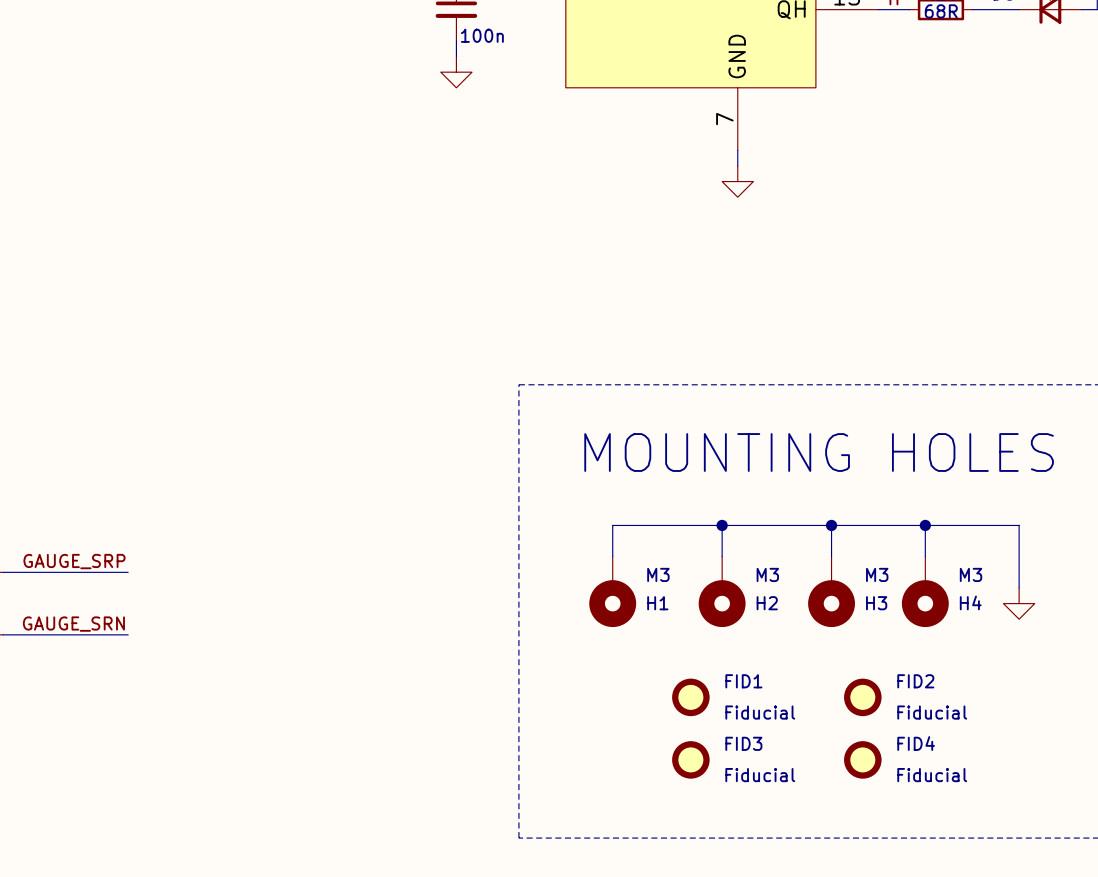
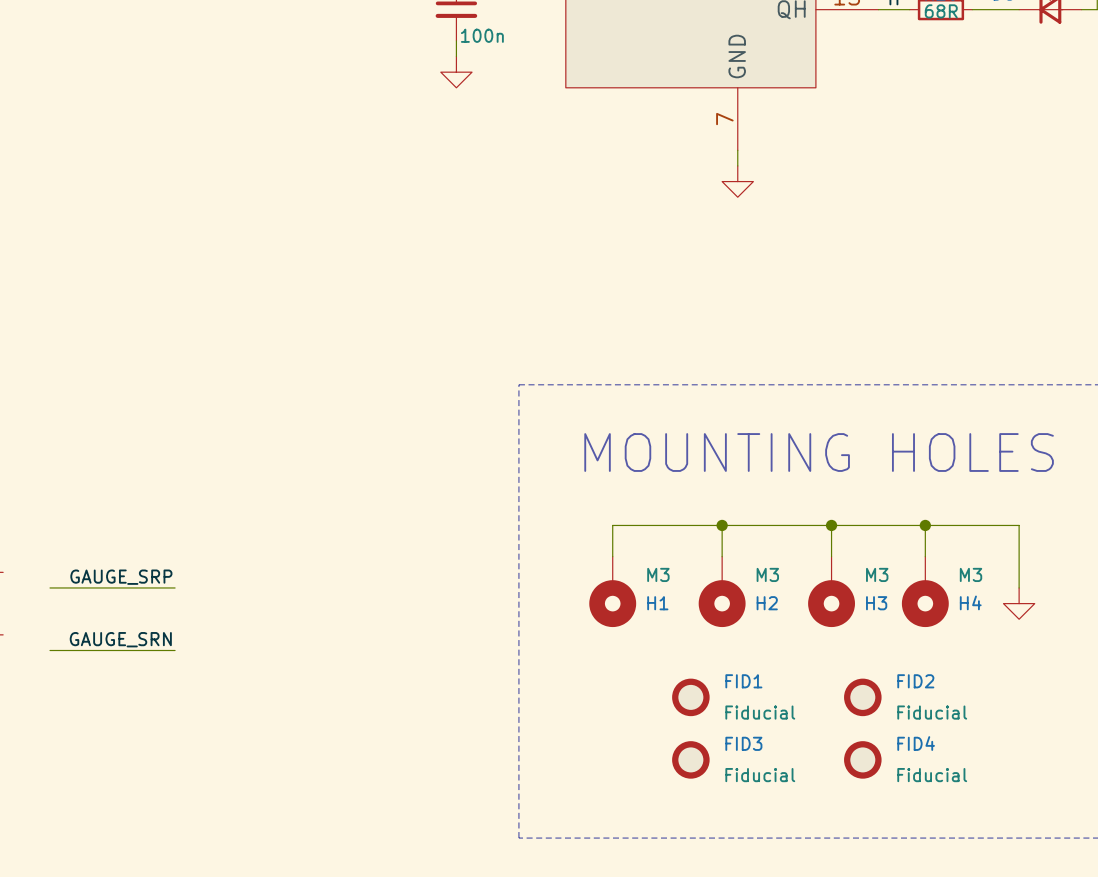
label position: GAUGE_SRP (74, 561) -> GAUGE_SRP (121, 577)
wire: (3, 572) (128, 572) -> (50, 587) (175, 587)
label position: GAUGE_SRN (73, 624) -> GAUGE_SRN (120, 639)
wire: (3, 634) (128, 634) -> (50, 650) (175, 650)

